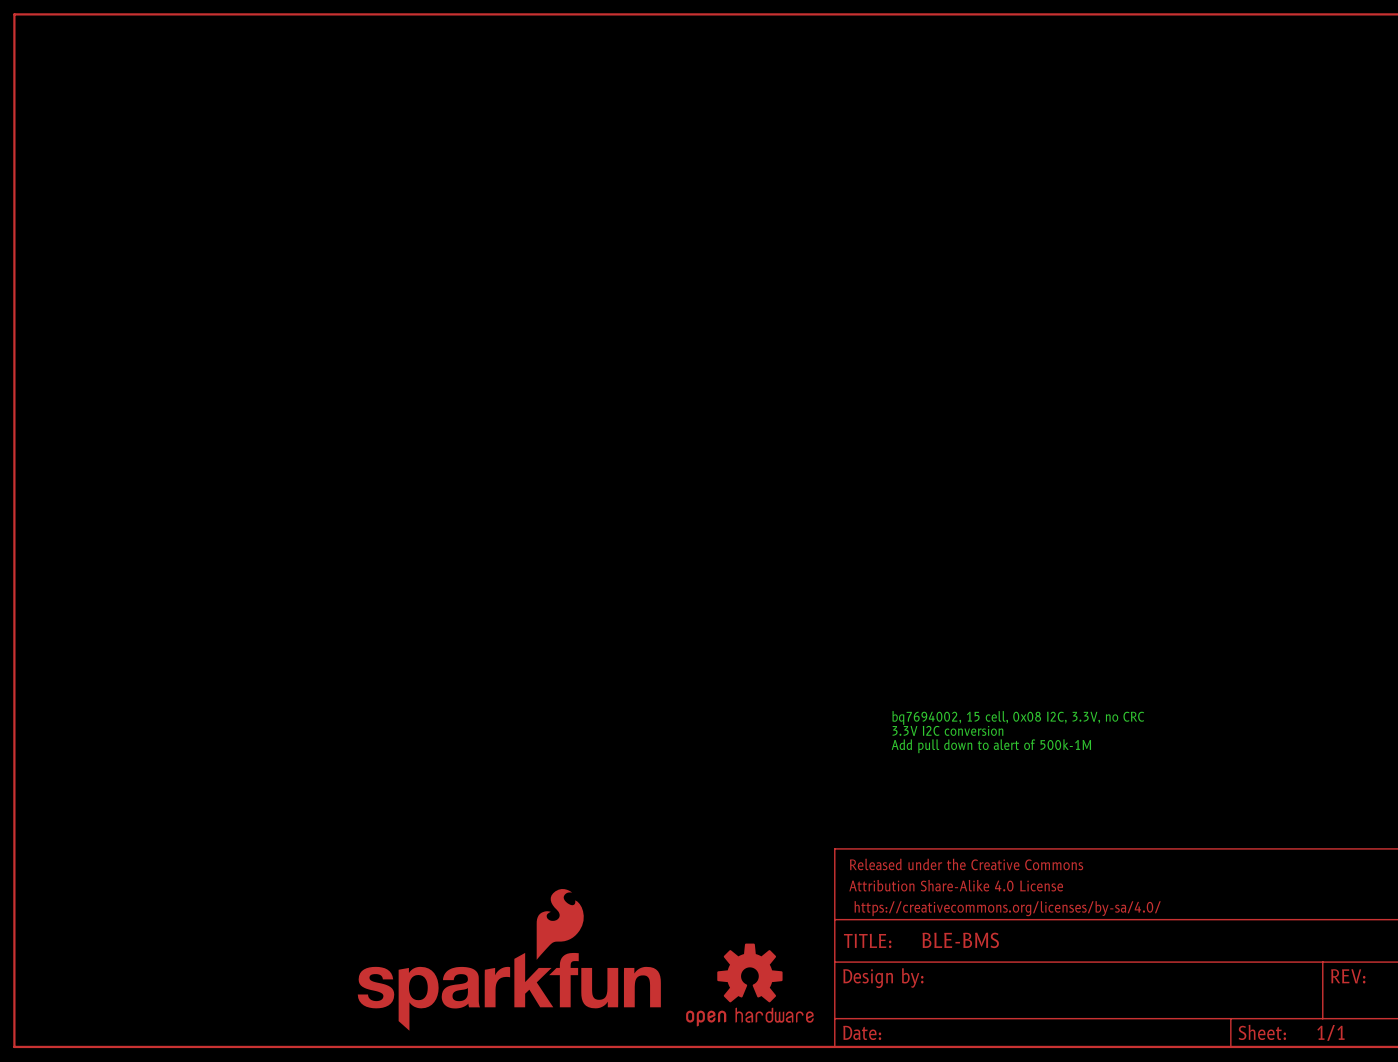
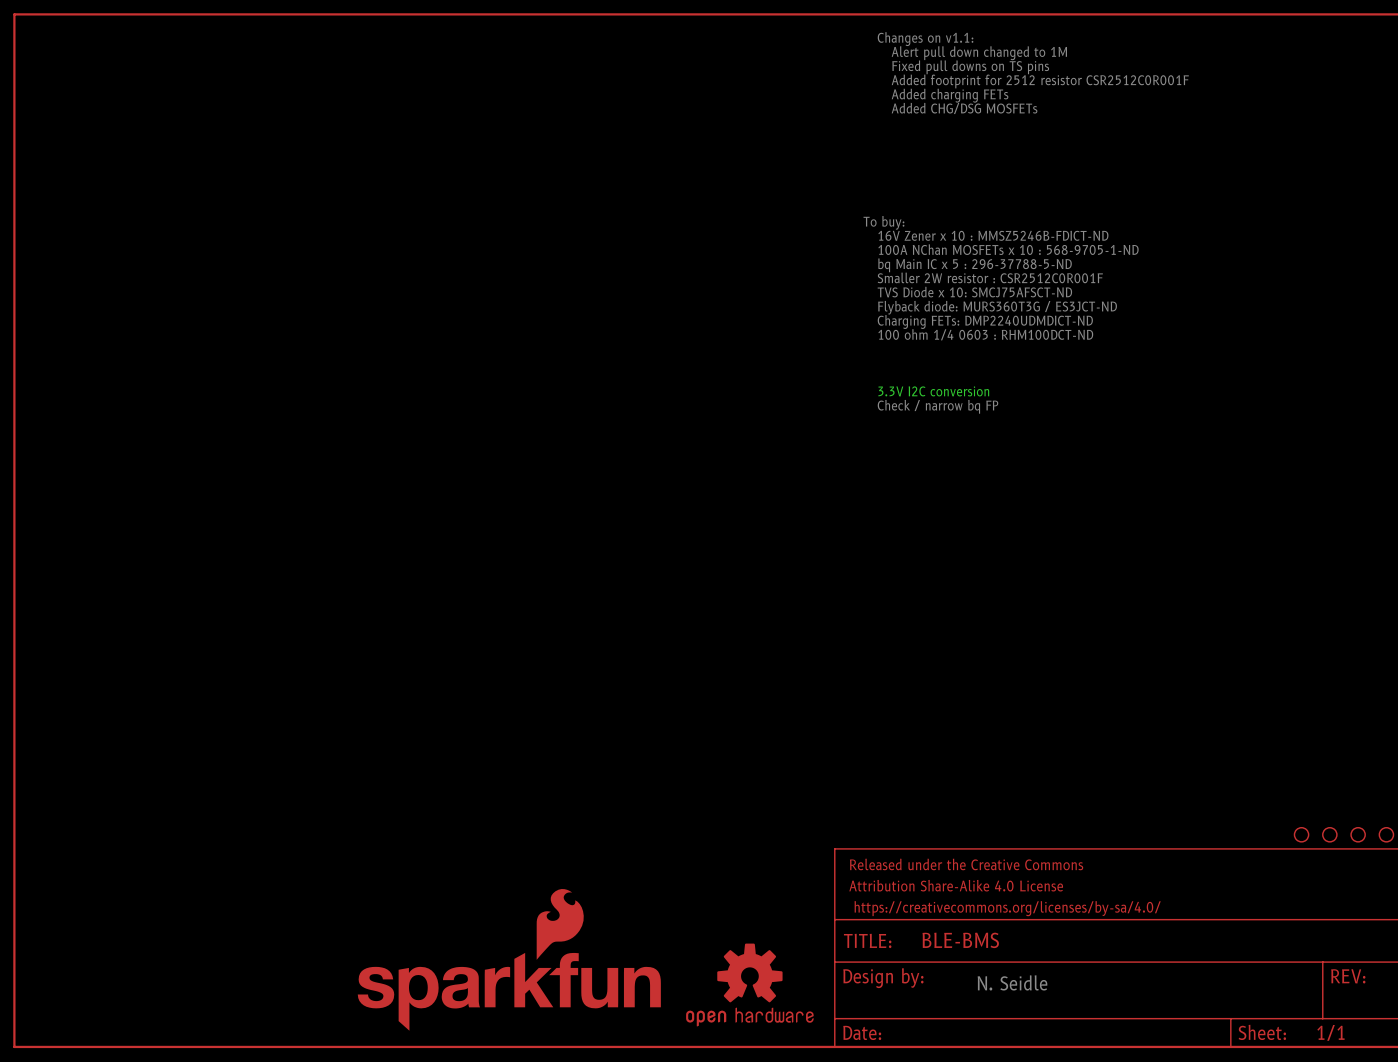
text: none -> Changes on v1.1: (925, 39)
text: none -> Alert pull down changed to 1M (979, 53)
text: none -> Fixed pull downs on TS pins (970, 67)
text: none -> Added footprint for 2512 resistor CSR2512C0R001F (1040, 81)
text: none -> Added charging FETs (950, 95)
text: none -> Added CHG/DSG MOSFETs (964, 108)
text: none -> To buy: (883, 222)
text: none -> 16V Zener x 10 : MMSZ5246B-FDICT-ND (993, 235)
text: none -> 100A NChan MOSFETs x 10 : 568-9705-1-ND (1008, 249)
text: none -> bq Main IC x 5 : 296-37788-5-ND (975, 265)
text: none -> Smaller 2W resistor : CSR2512C0R001F (990, 277)
text: none -> TVS Diode x 10: SMCJ75AFSCT-ND (974, 292)
text: none -> Flyback diode: MURS360T3G / ES3JCT-ND (997, 307)
text: none -> Charging FETs: DMP2240UDMDICT-ND (985, 321)
text: none -> 100 ohm 1/4 0603 : RHM100DCT-ND (985, 334)
text: none -> 3.3V I2C conversion (933, 391)
text: none -> Check / narrow bq FP (937, 406)
text: bq7694002, 15 cell, 0x08 I2C, 3.3V, no CRC (1018, 717) -> none
text: 3.3V I2C conversion (947, 730) -> none
text: Add pull down to alert of 500k-1M (991, 746) -> none
part: none -> (1301, 834)
part: none -> (1329, 834)
part: none -> (1358, 834)
part: none -> (1386, 834)
text: none -> N. Seidle (1012, 982)

